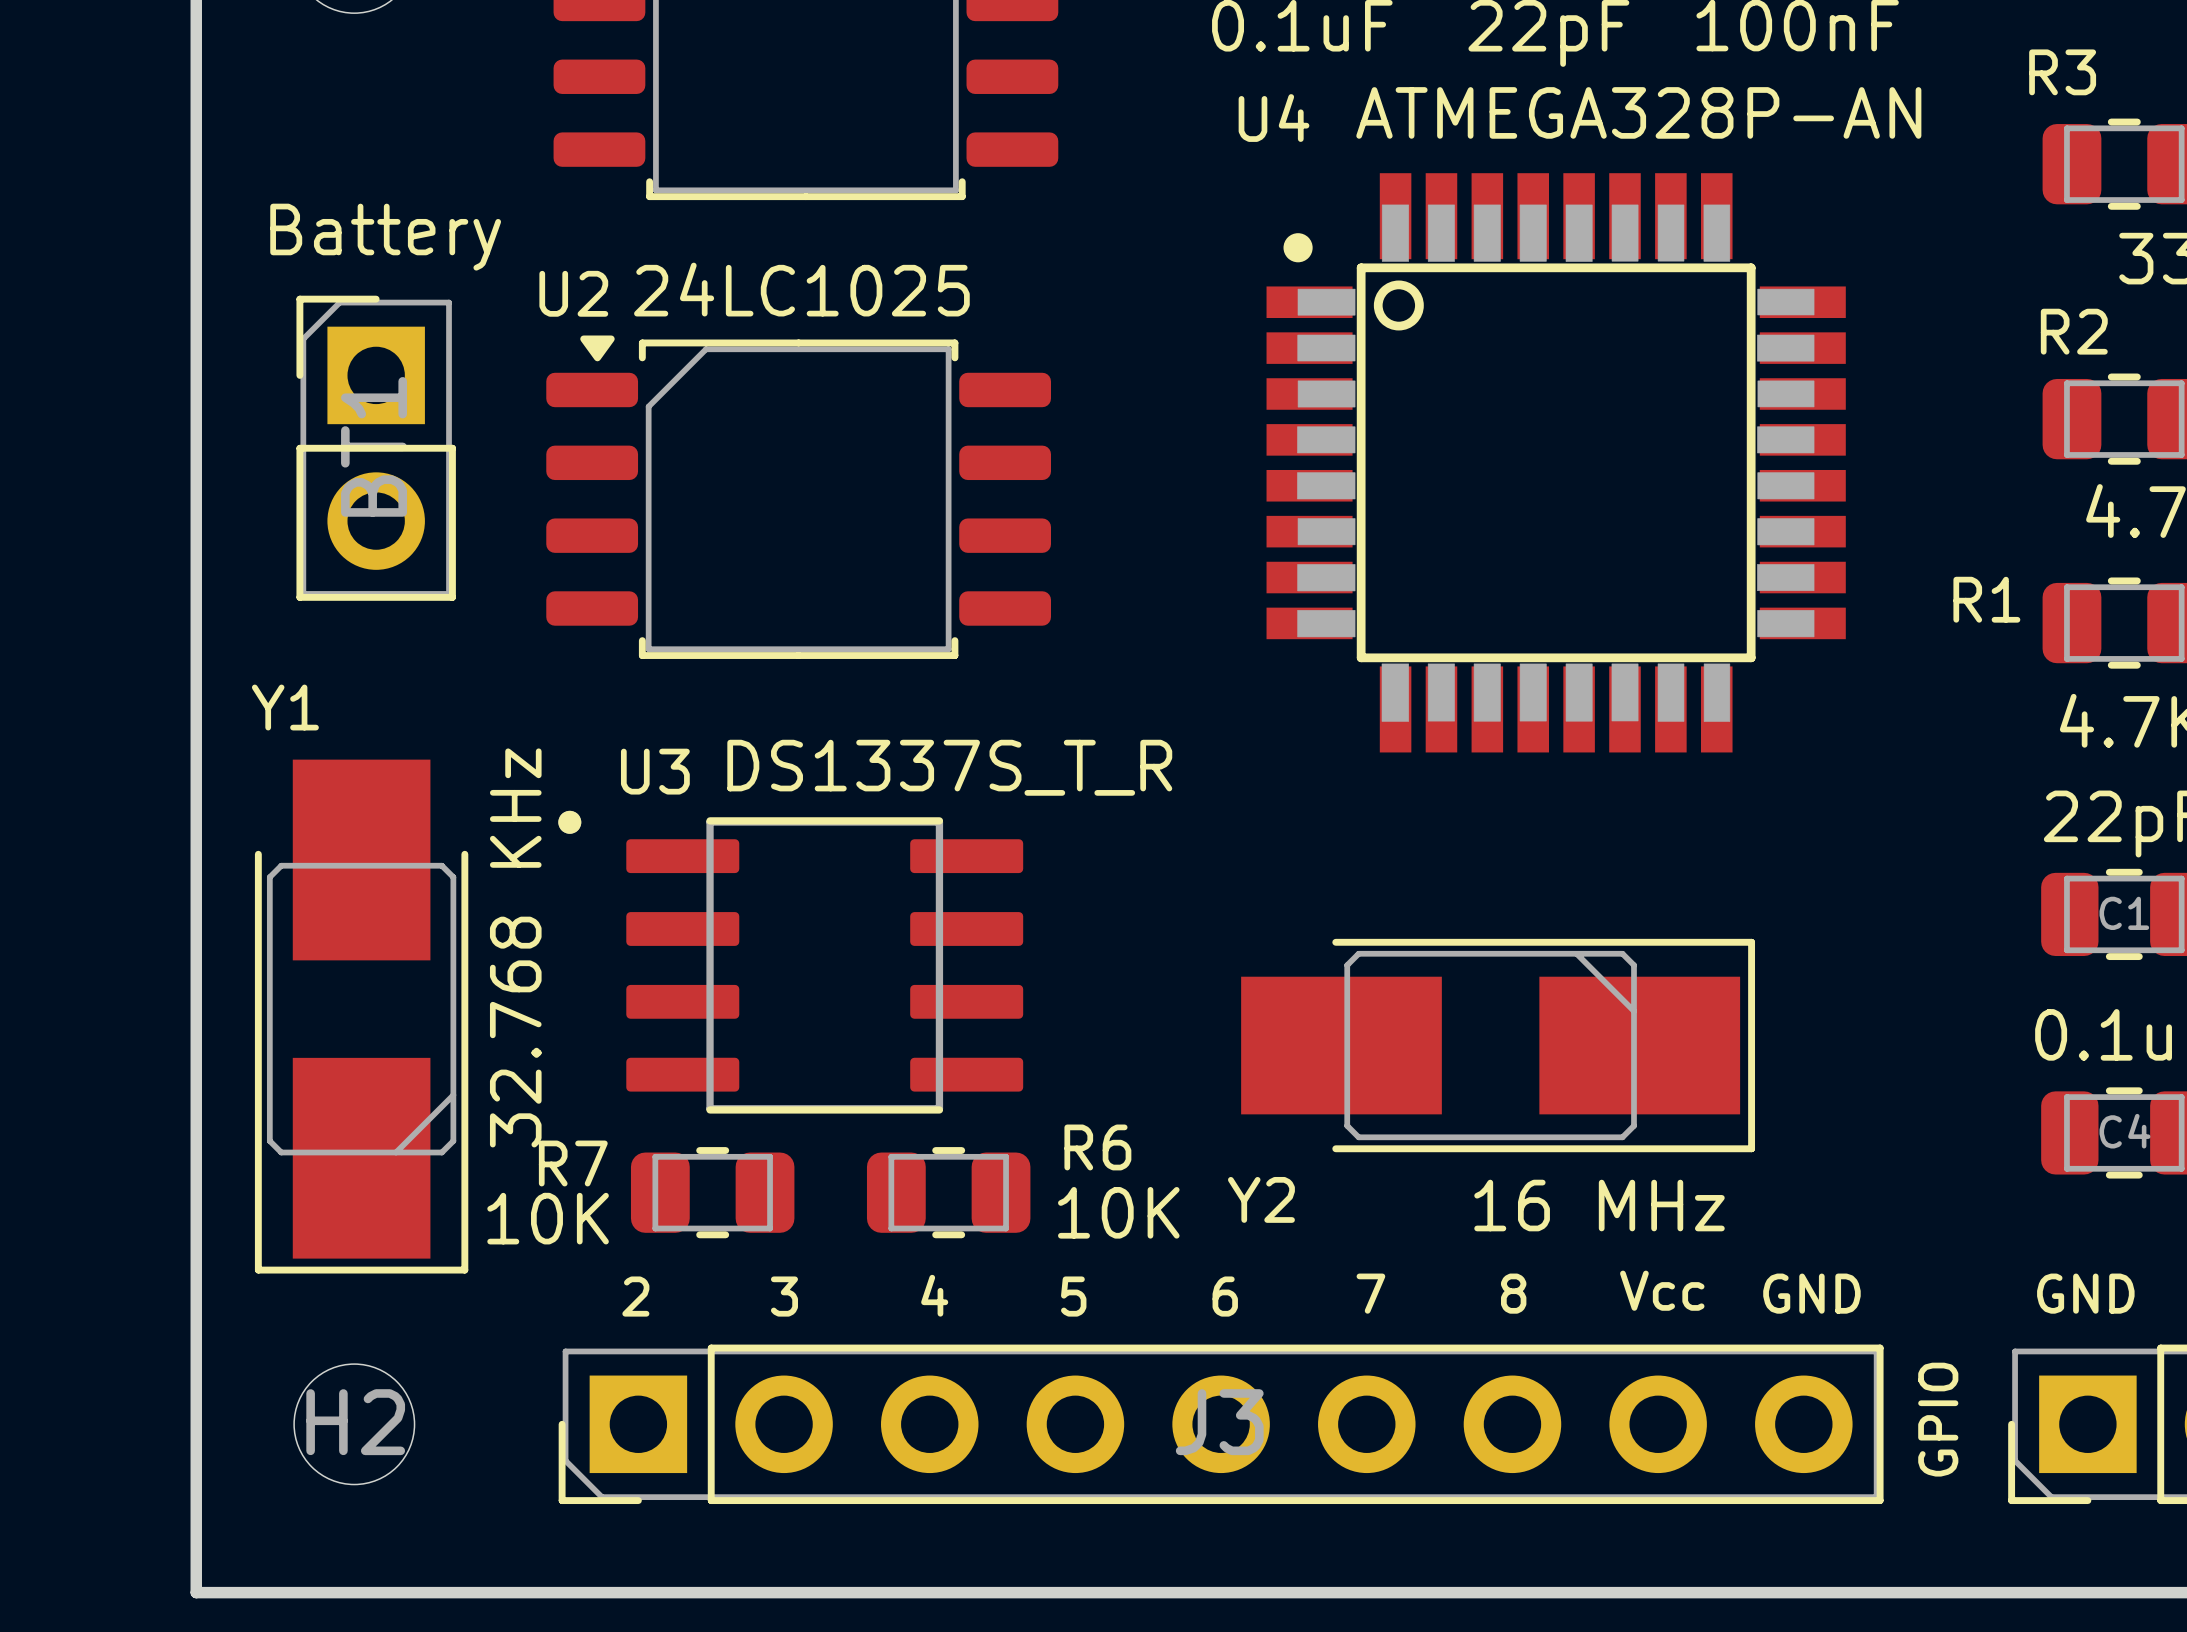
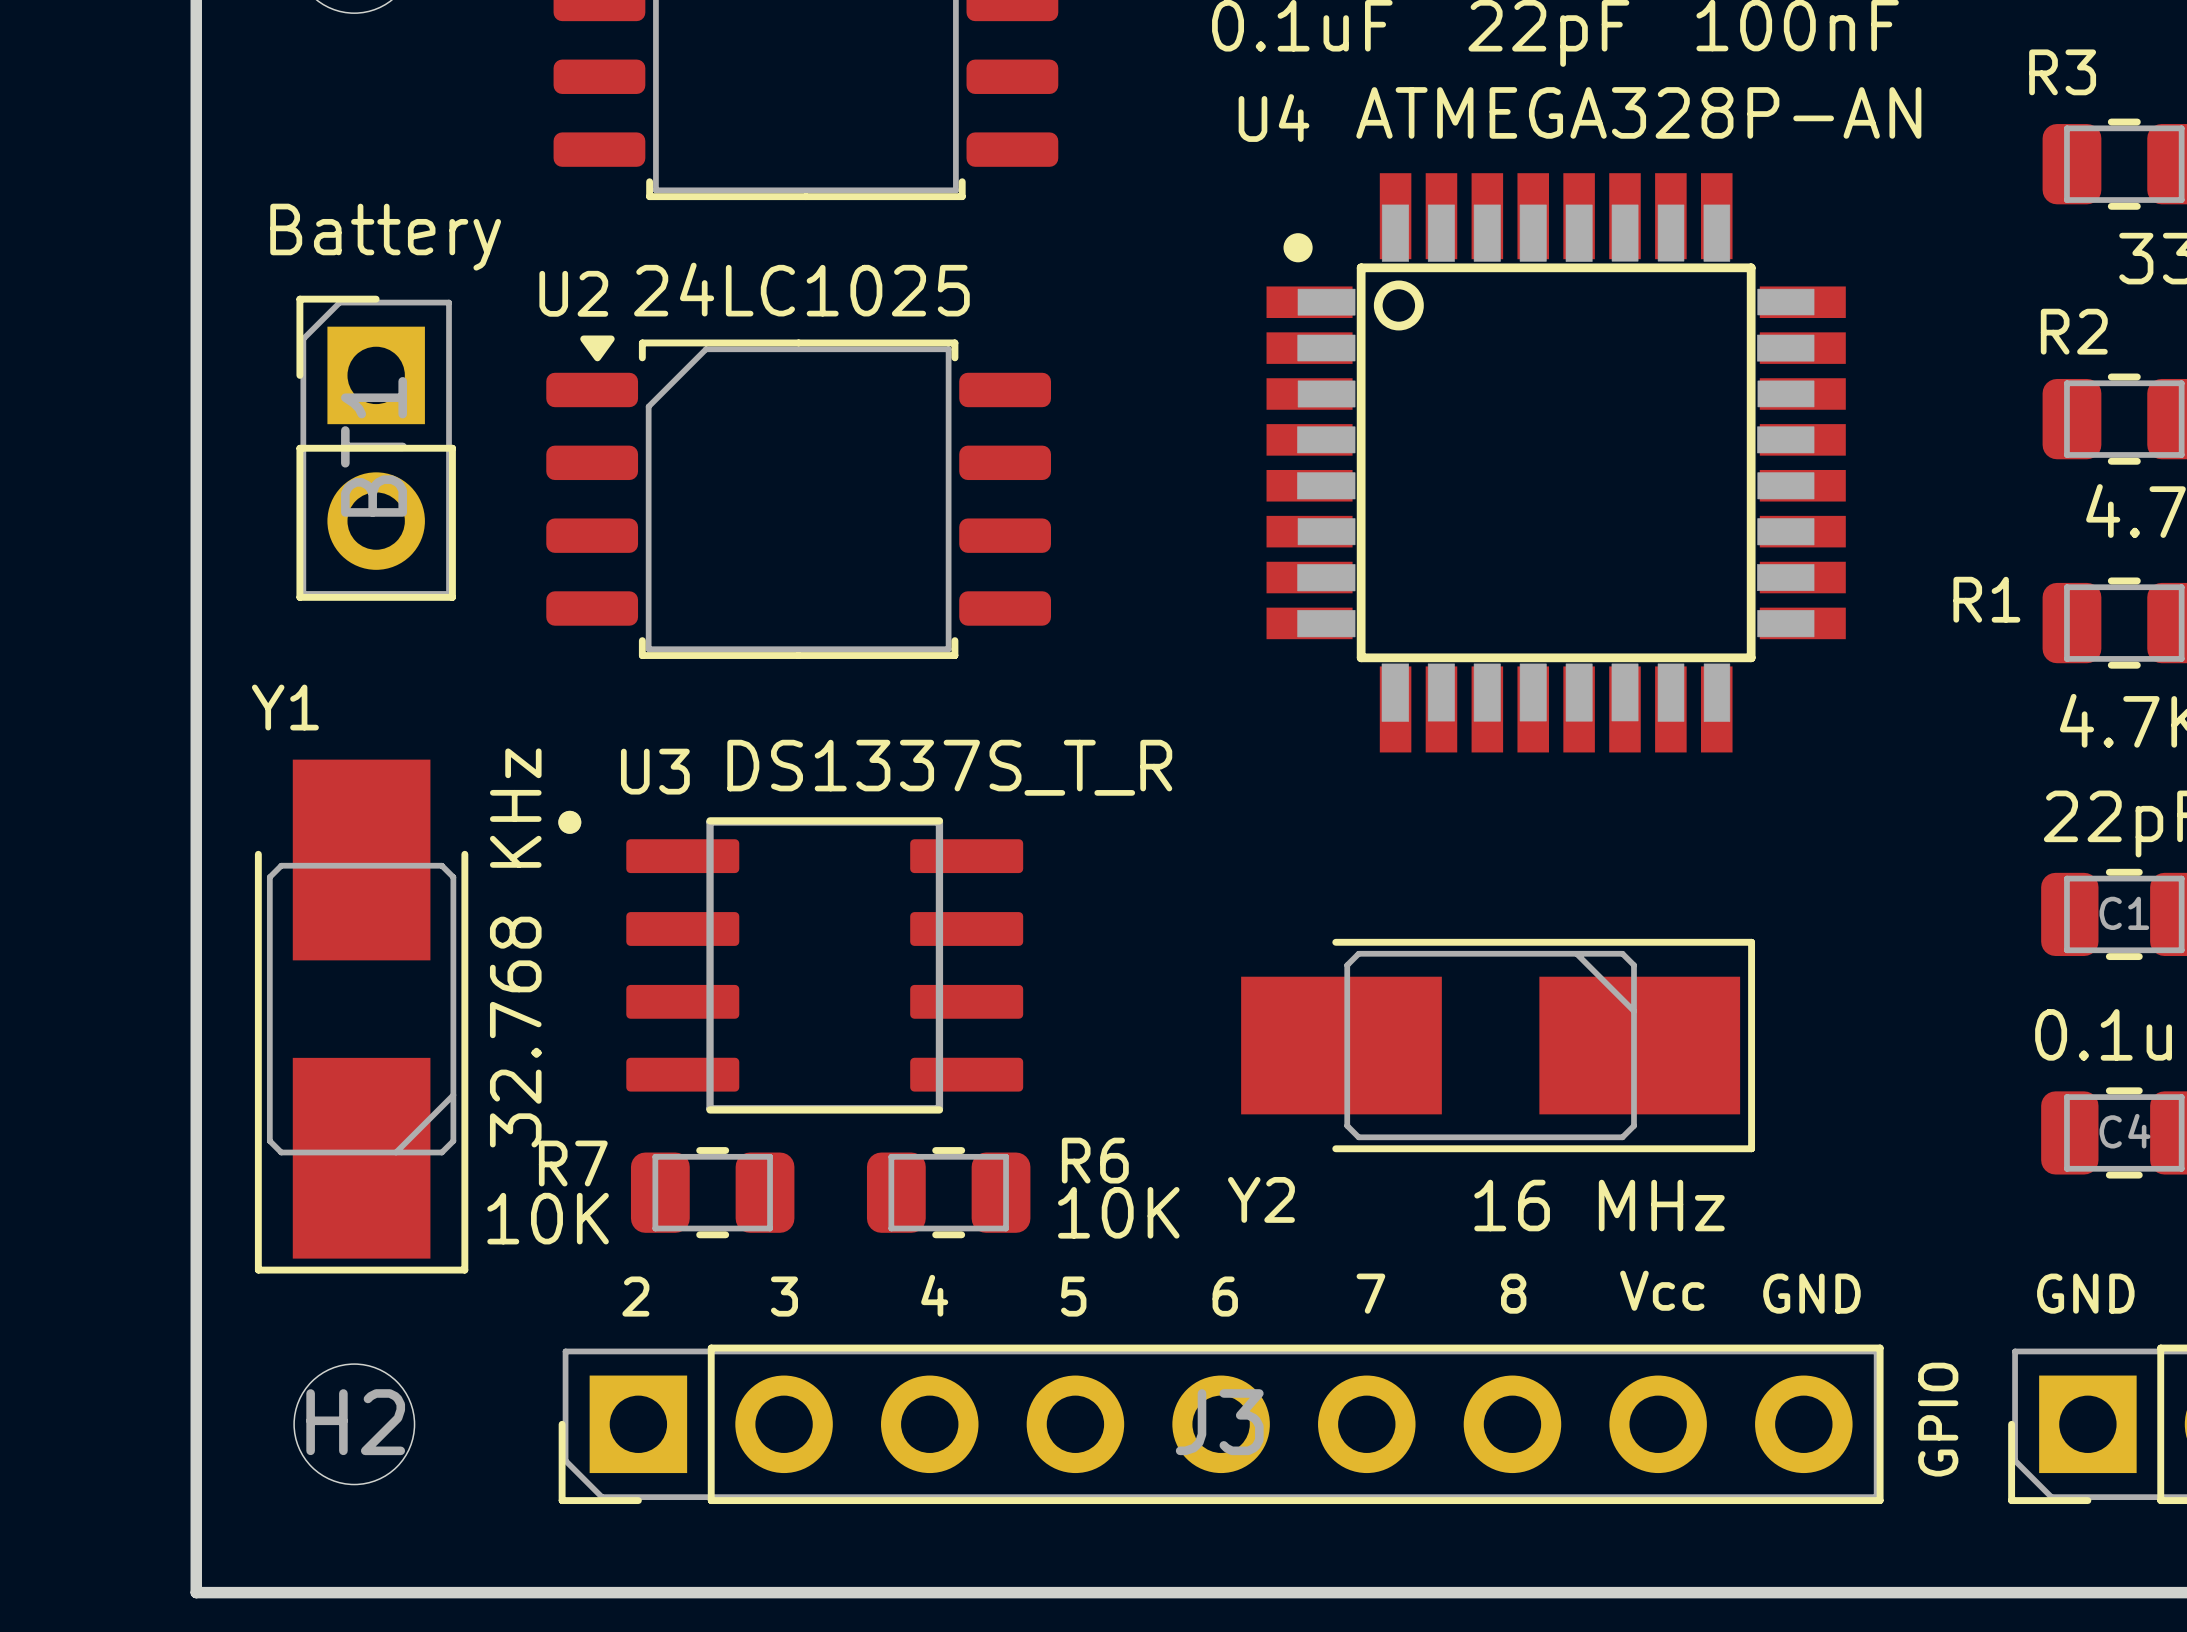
R6 name position: R6 (1097, 1147) -> R6 (1095, 1160)

